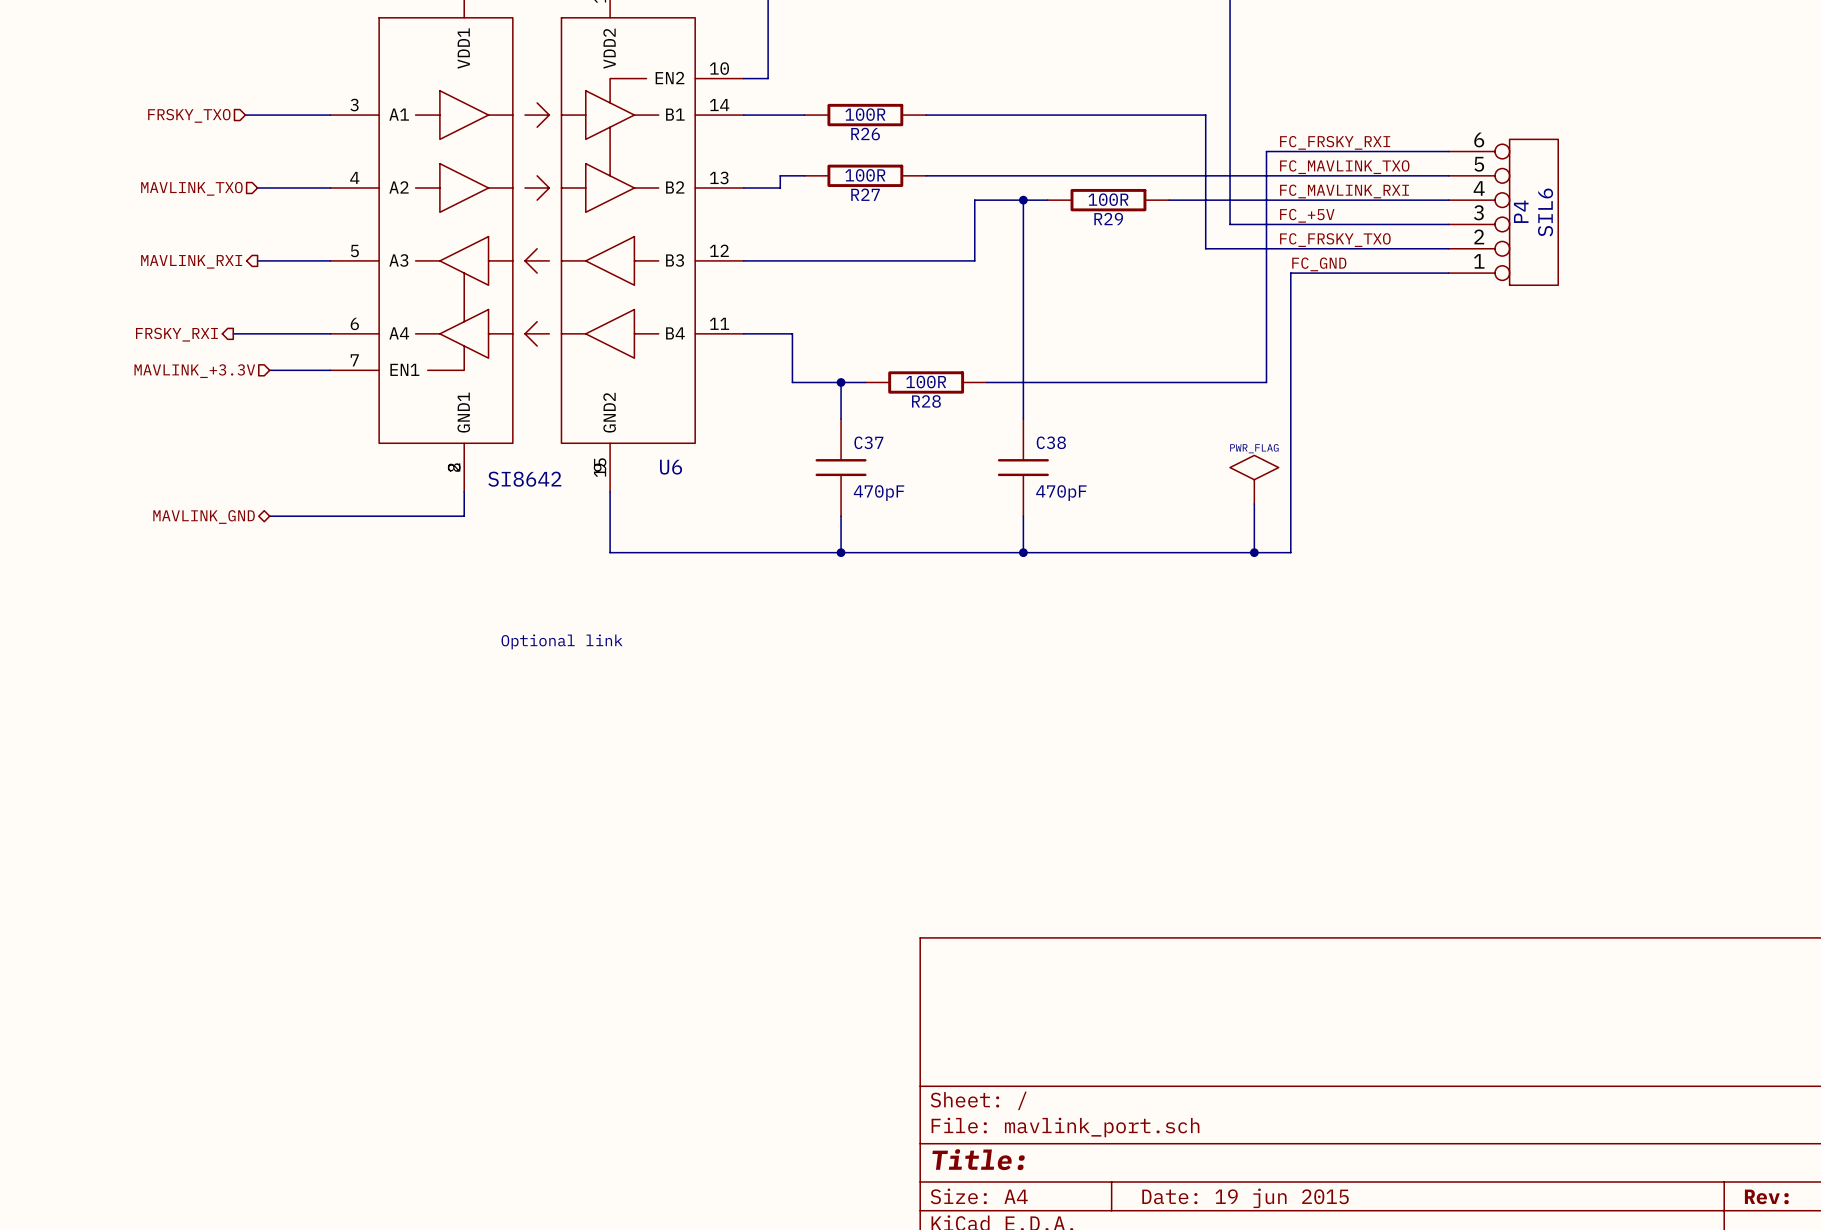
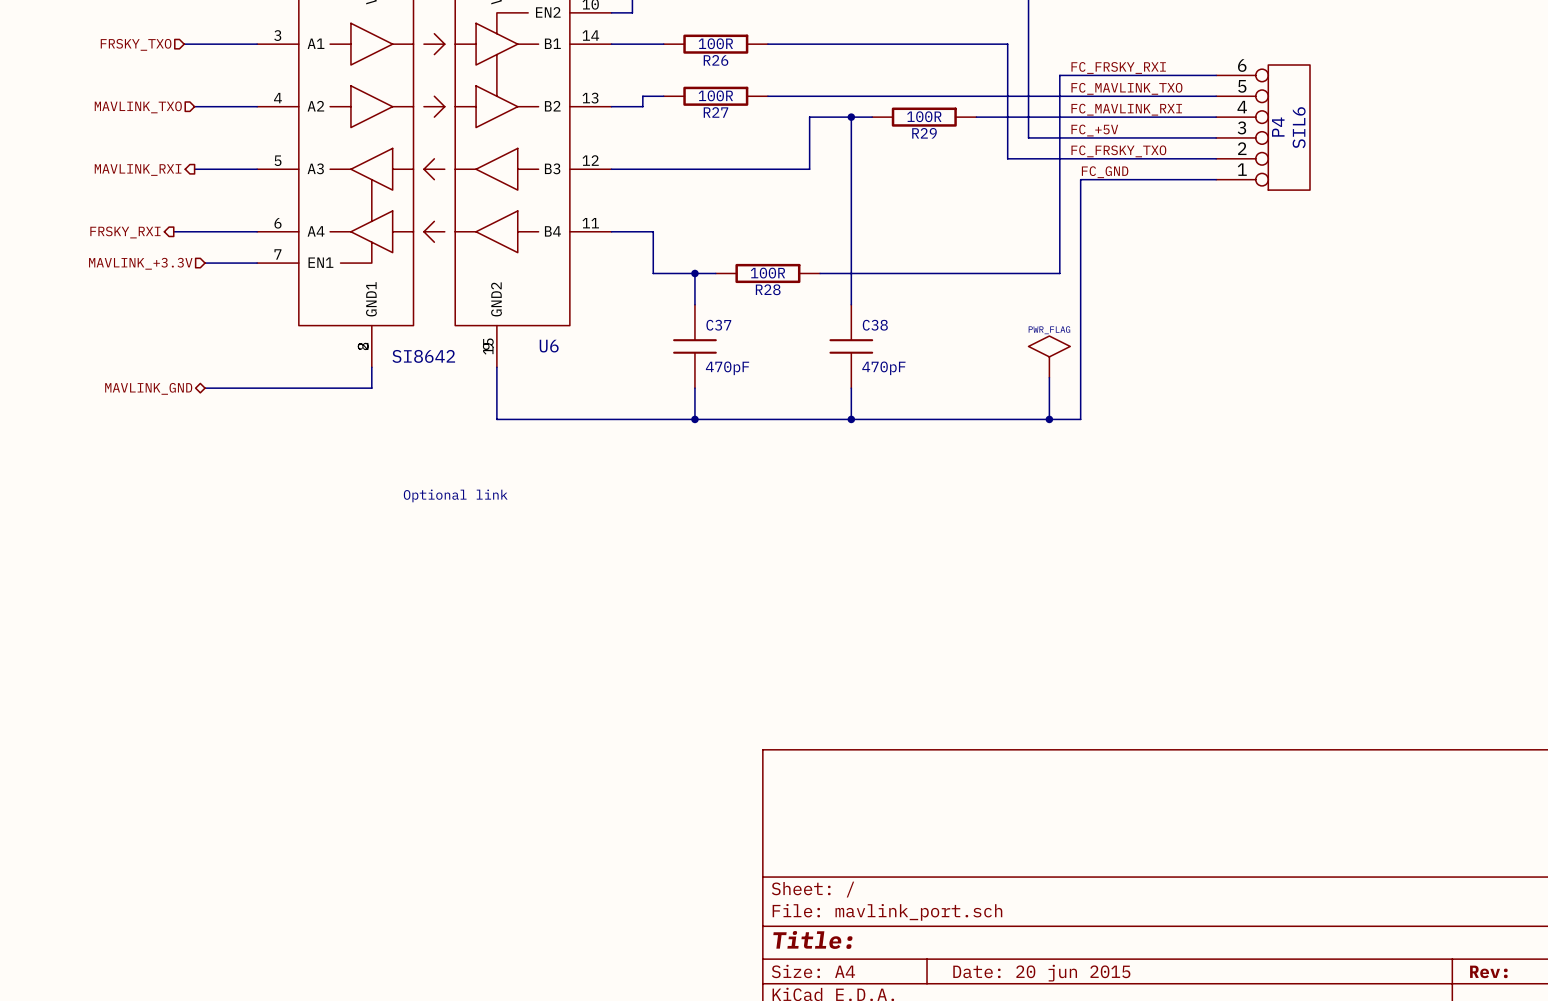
title block: Date: 19 jun 2015 (1245, 1198) -> Date: 20 jun 2015 (1041, 973)

